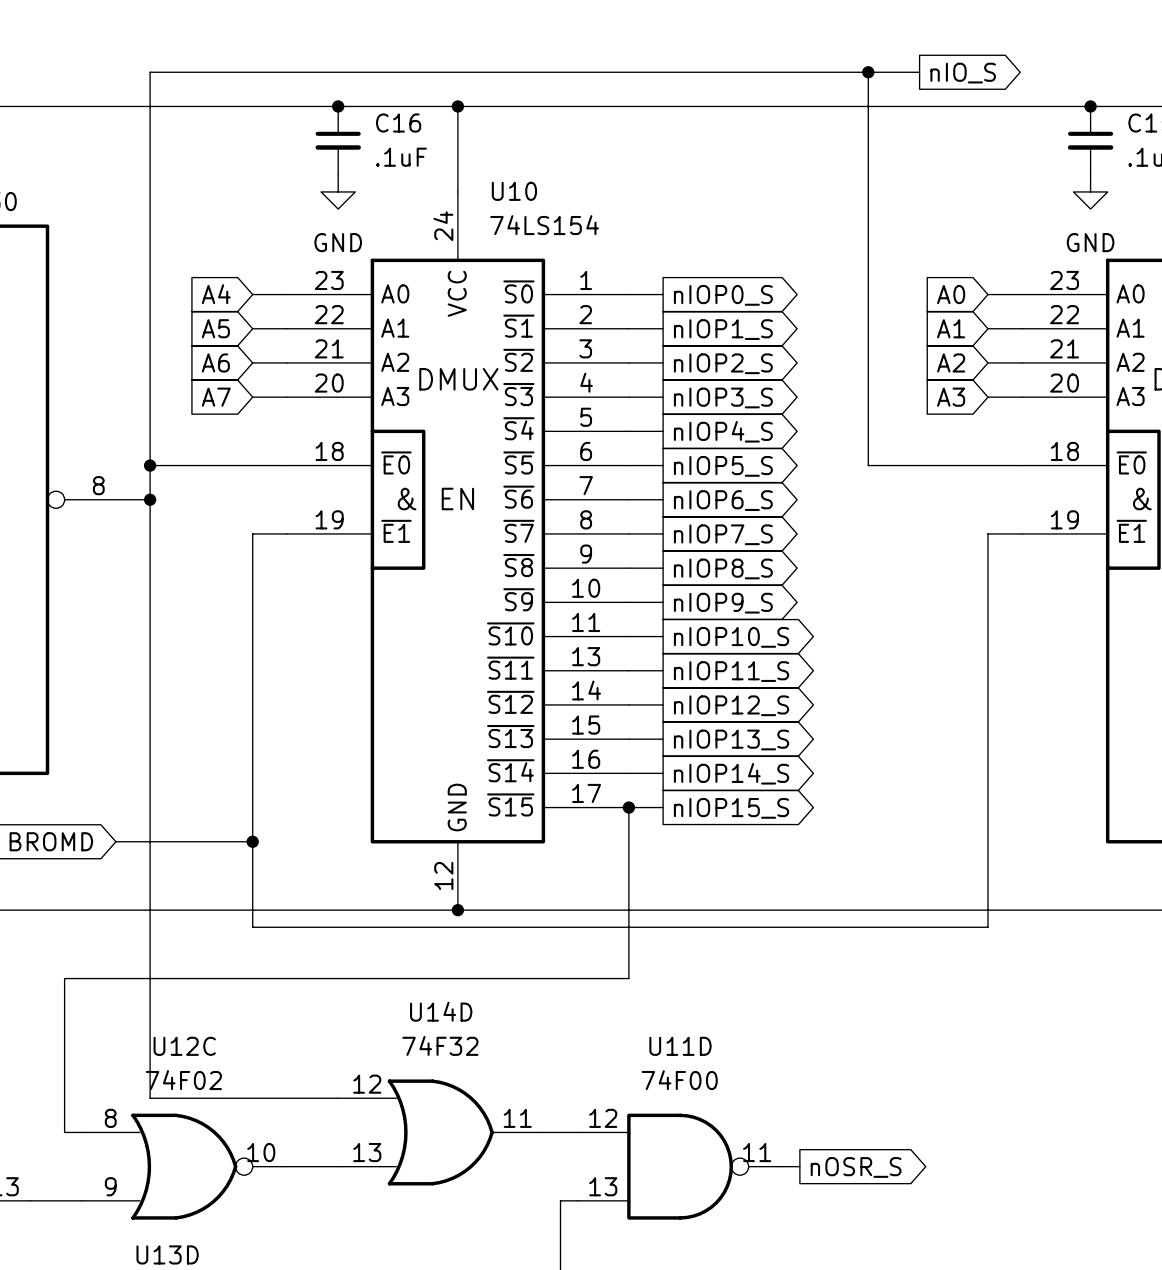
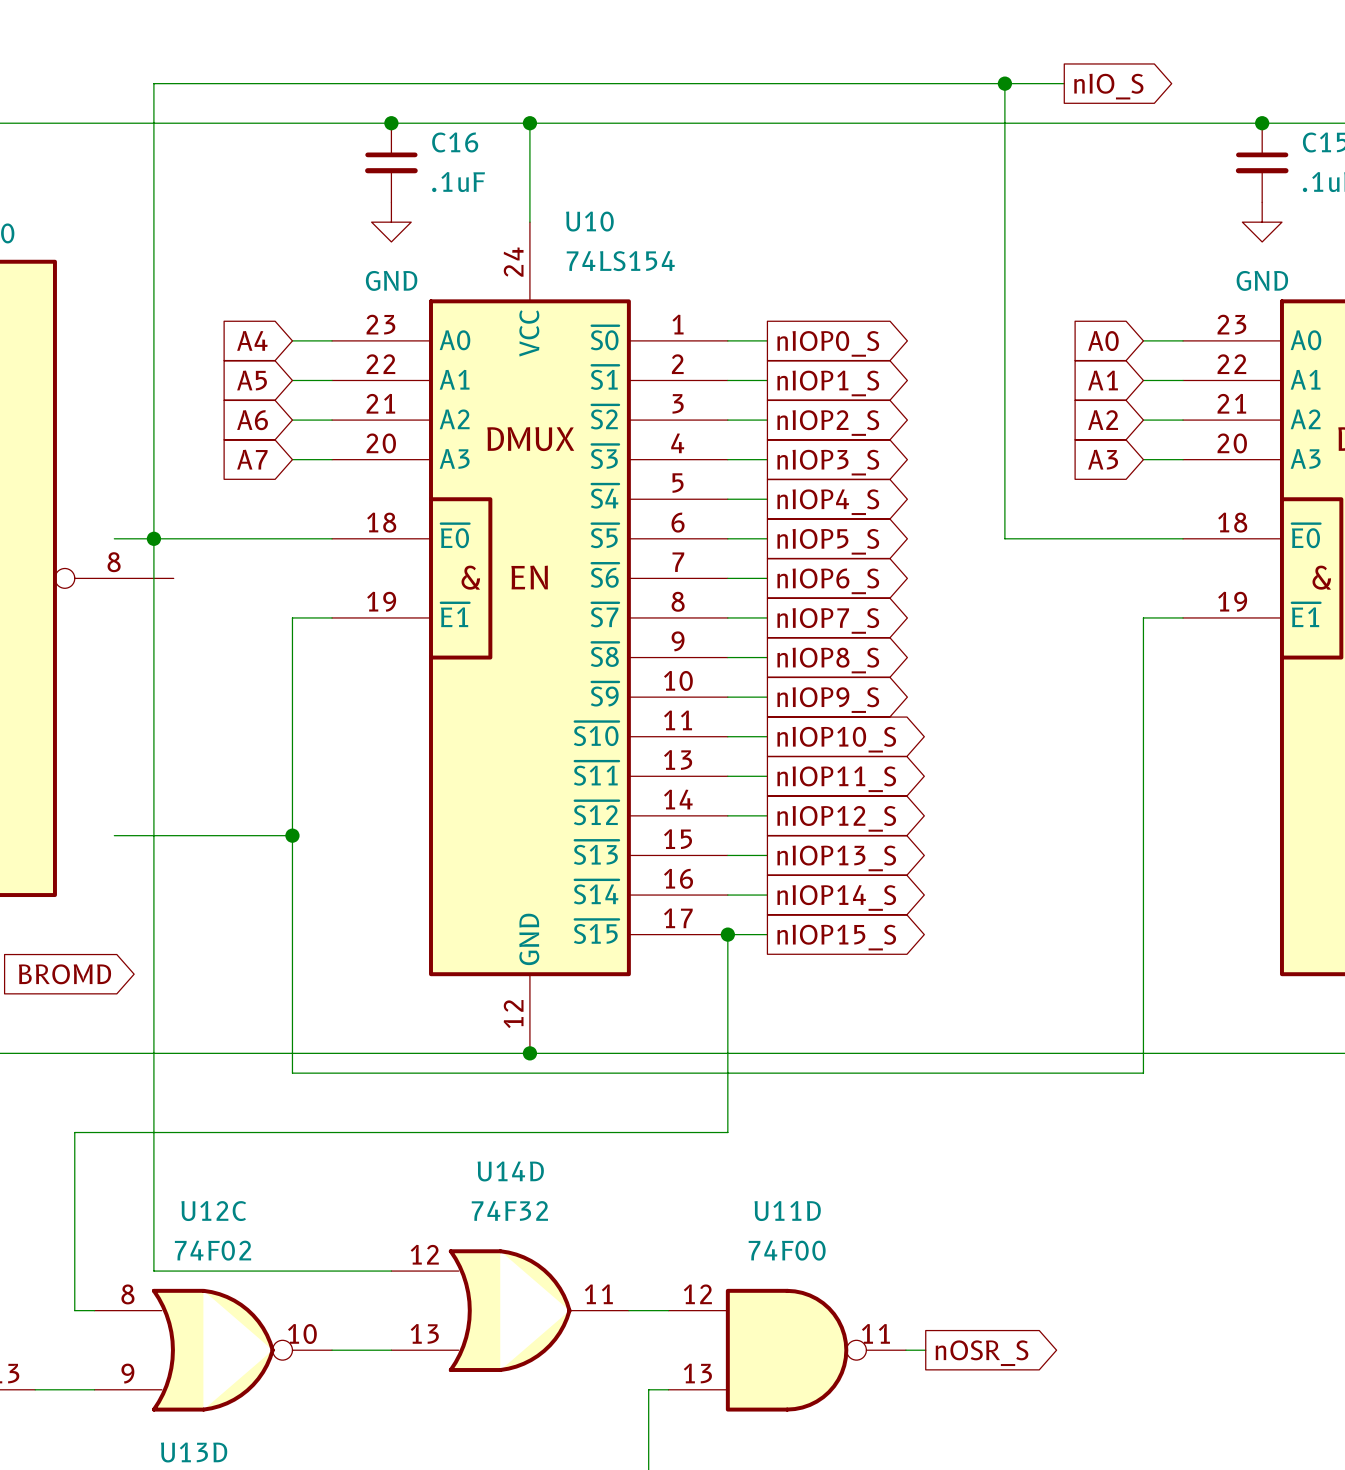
wire: (150, 72) (150, 1098) -> (173, 83) (153, 83) (153, 1271) (173, 1271)
wire: none -> (114, 538) (173, 538)
junction position: (150, 465) -> (153, 538)
junction: (150, 499) -> none
wire: none -> (114, 835) (292, 835)
junction: none -> (292, 835)
wire: (115, 841) (252, 841) -> none
junction: (252, 841) -> none

